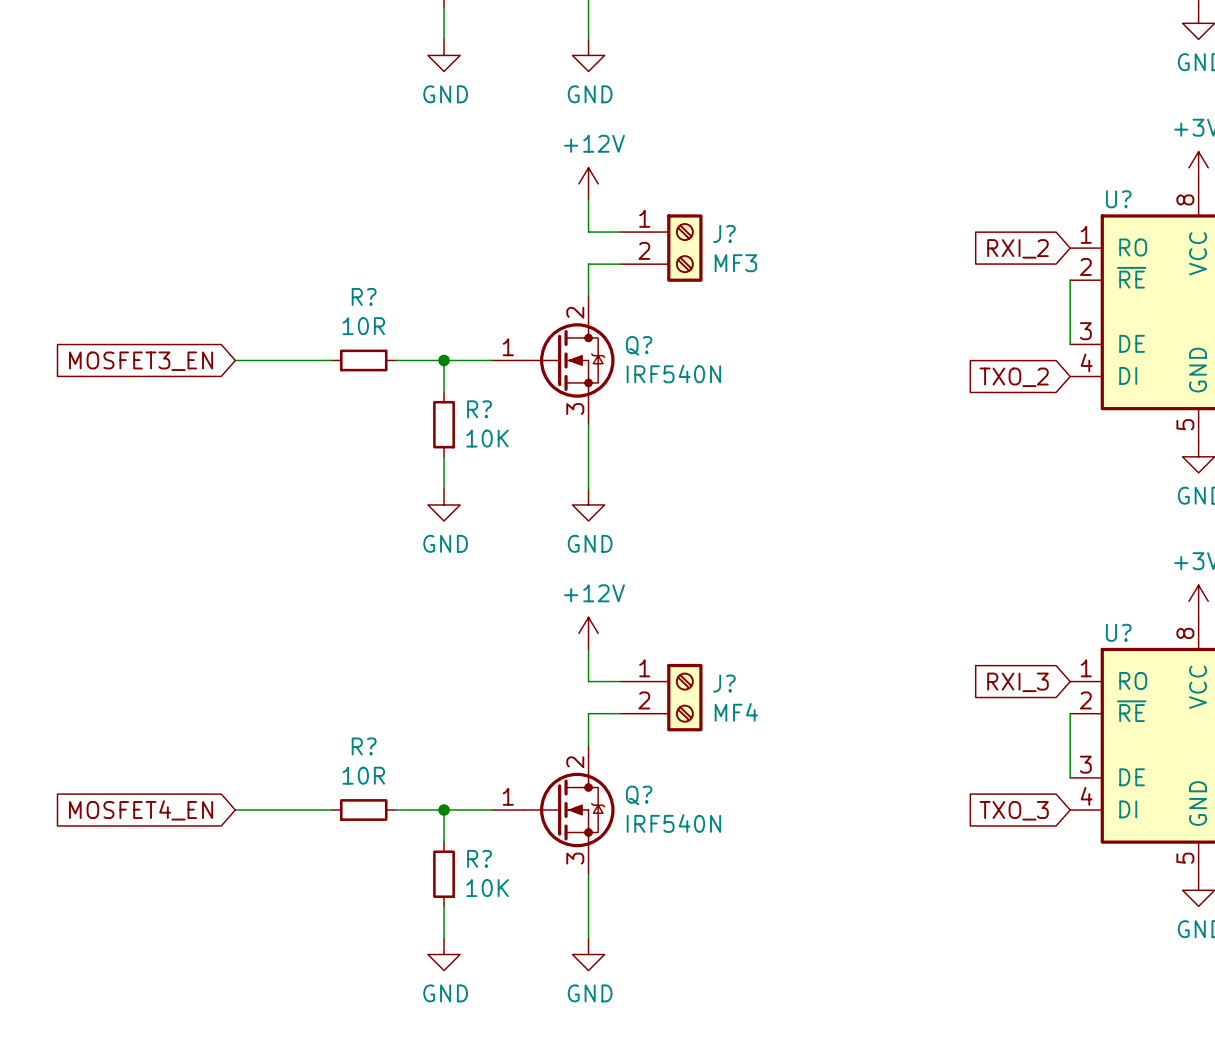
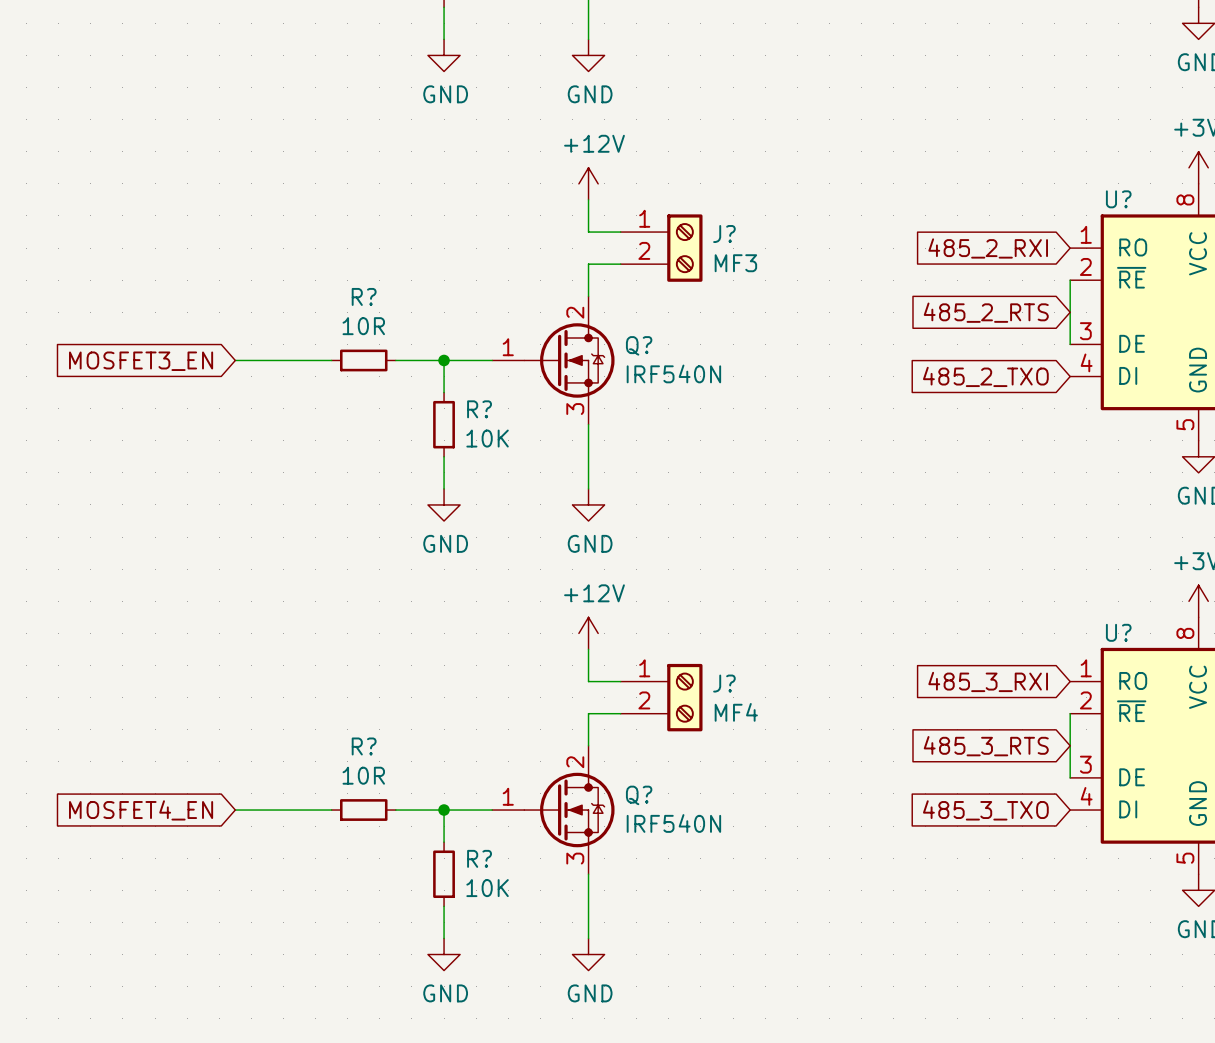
global label: RXI_2 (1017, 248) -> 485_2_RXI (988, 248)
global label: none -> 485_2_RTS (986, 312)
global label: TXO_2 (1014, 377) -> 485_2_TXO (985, 376)
global label: RXI_3 (1017, 682) -> 485_3_RXI (988, 681)
global label: none -> 485_3_RTS (986, 746)
global label: TXO_3 (1014, 810) -> 485_3_TXO (985, 810)

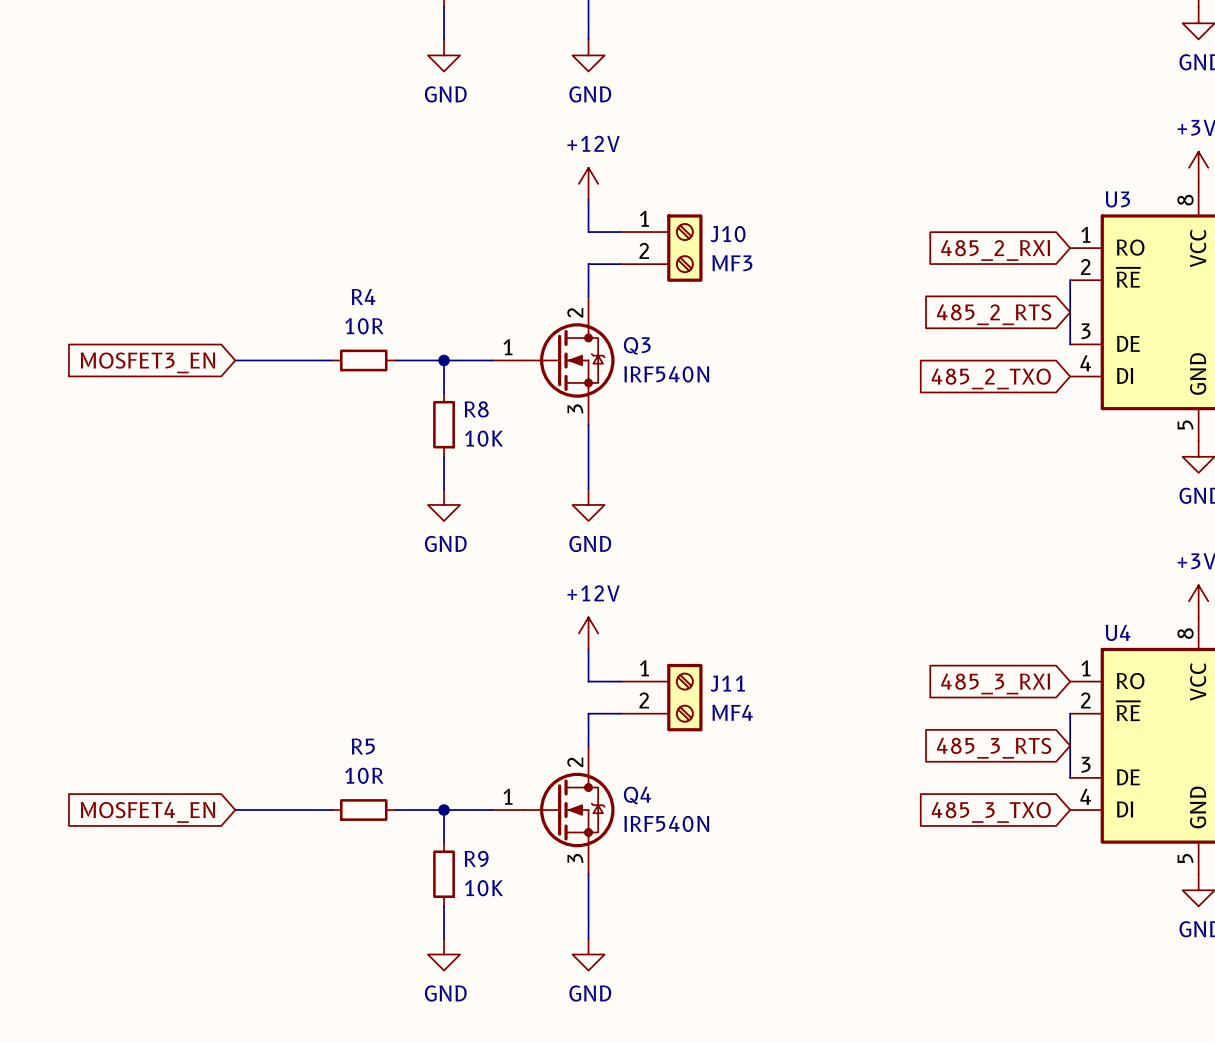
U? name: U? (1118, 199) -> U3 (1117, 199)
J? name: J? (724, 234) -> J10 (728, 234)
R? name: R? (364, 296) -> R4 (363, 296)
Q? name: Q? (639, 345) -> Q3 (637, 345)
R? name: R? (479, 409) -> R8 (476, 409)
U? name: U? (1118, 632) -> U4 (1118, 632)
J? name: J? (724, 683) -> J11 (727, 683)
R? name: R? (364, 746) -> R5 (363, 746)
Q? name: Q? (639, 795) -> Q4 (637, 795)
R? name: R? (479, 858) -> R9 (476, 858)

